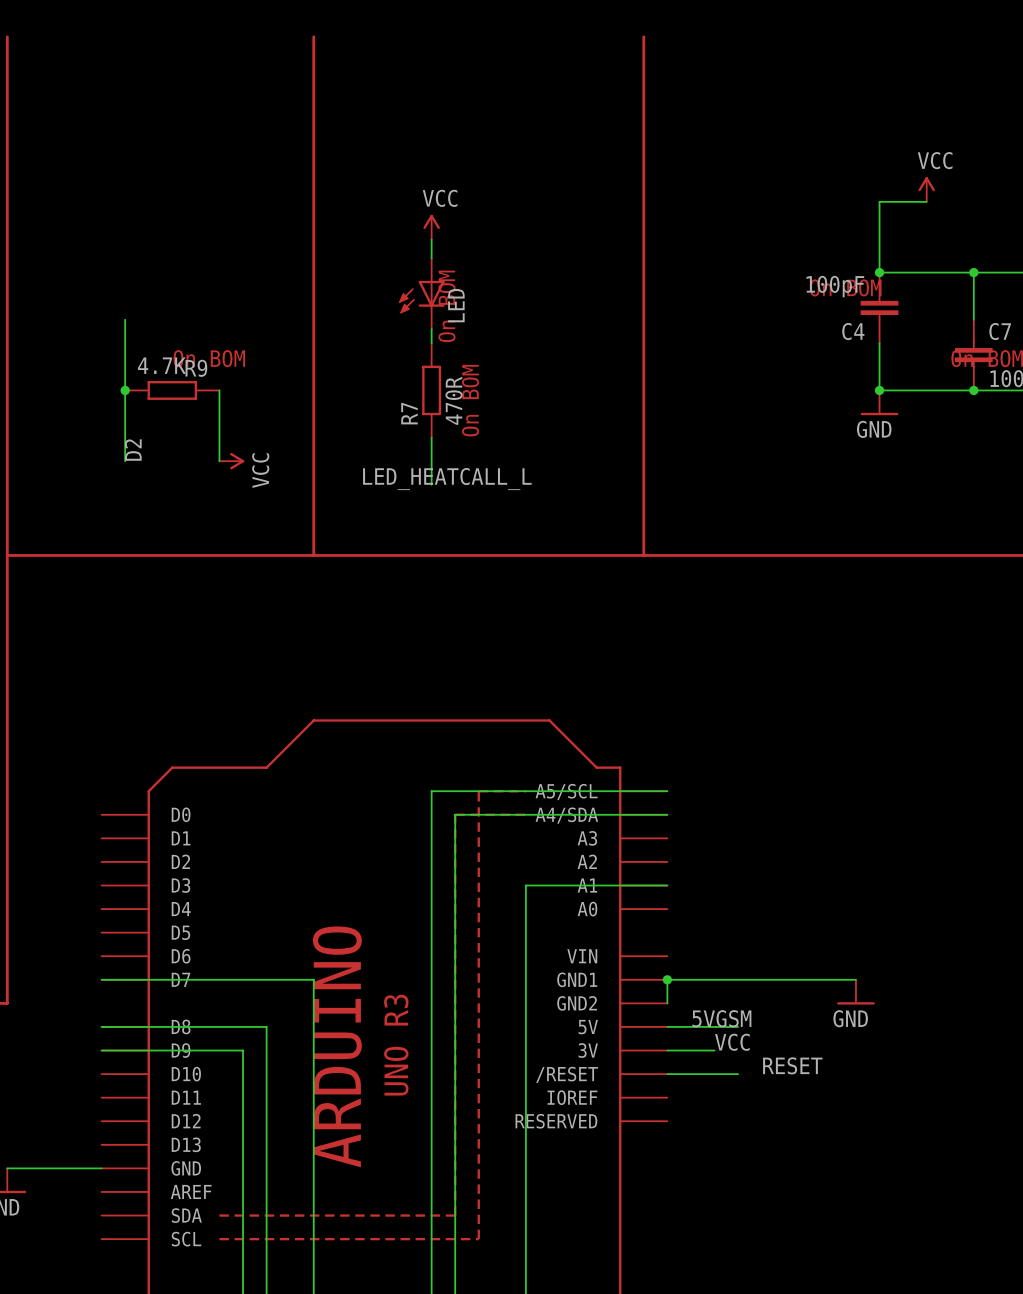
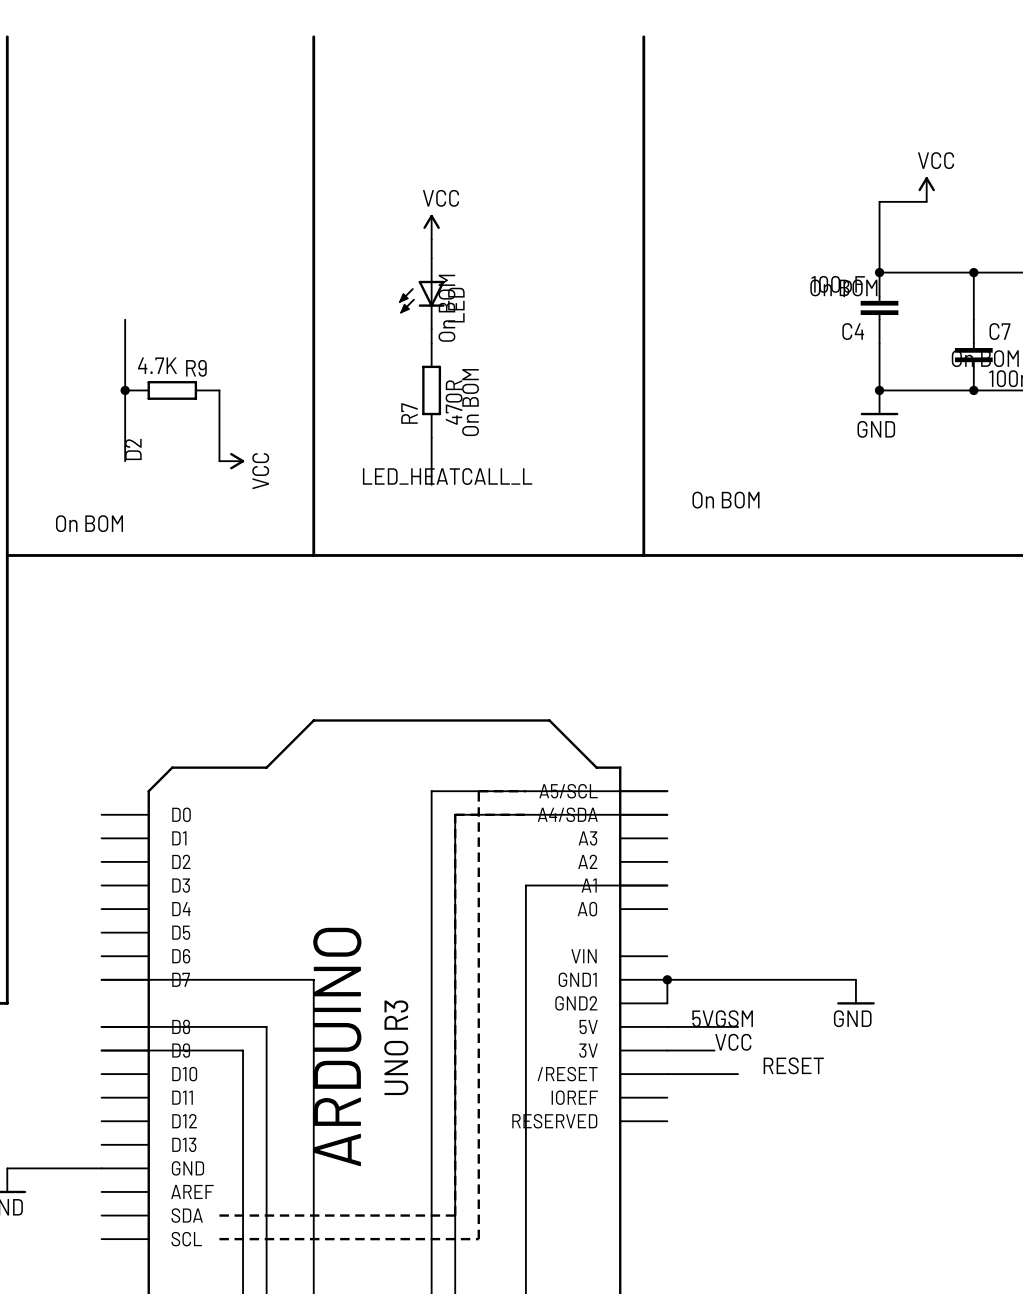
text position: On BOM (209, 358) -> On BOM (89, 523)
text: none -> On BOM (725, 500)

